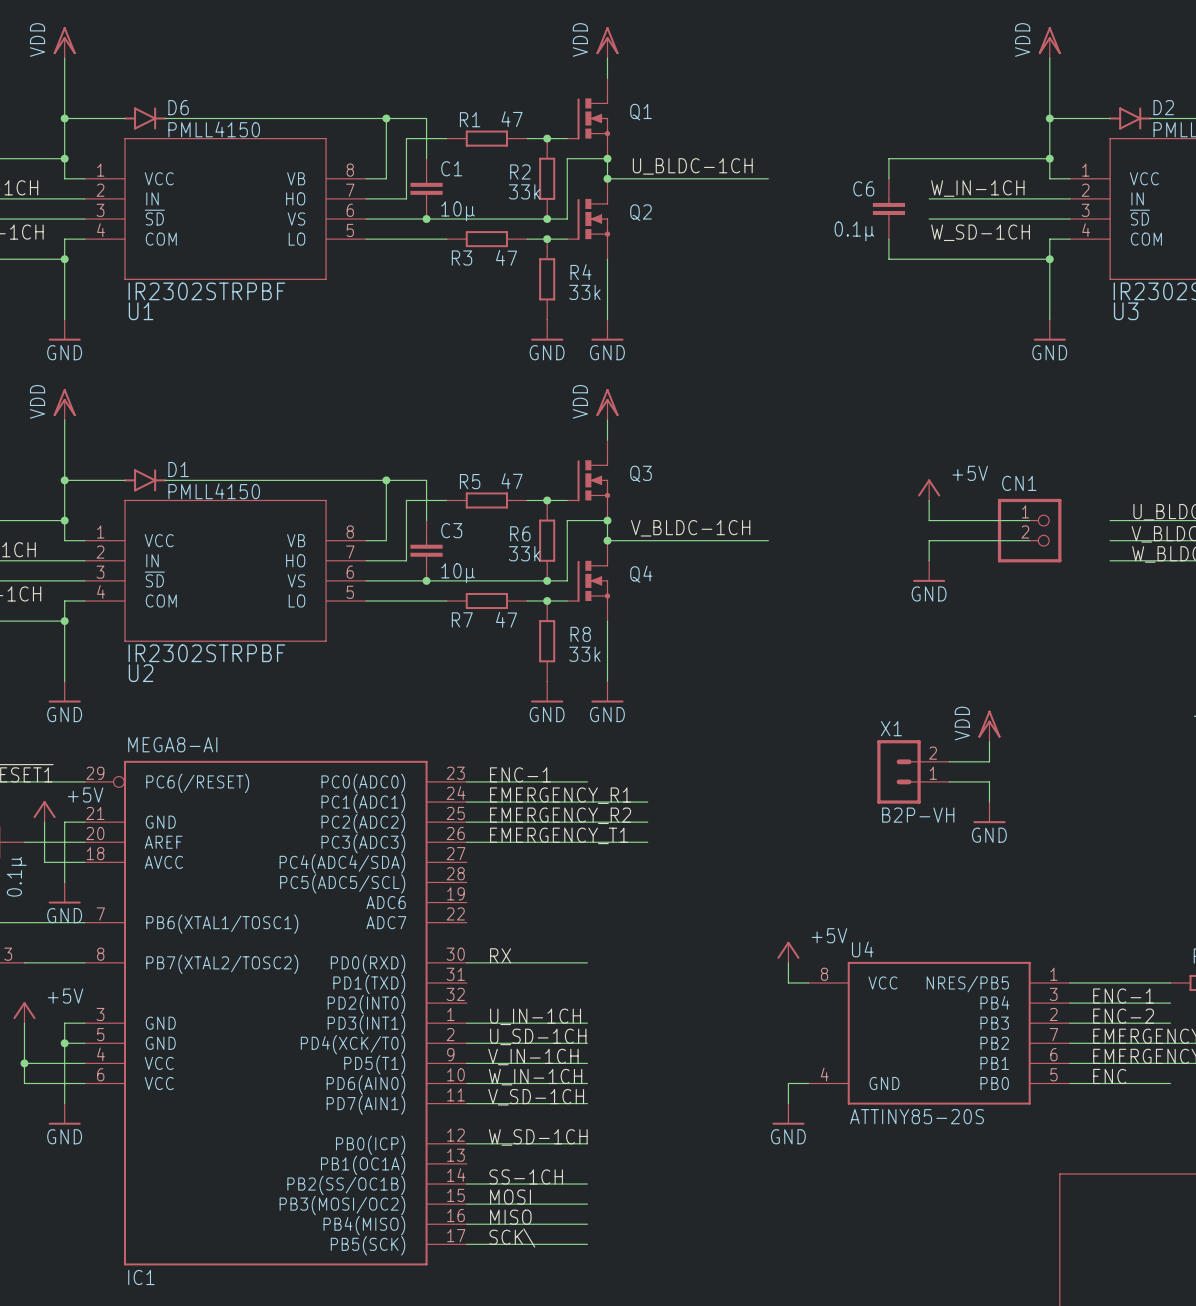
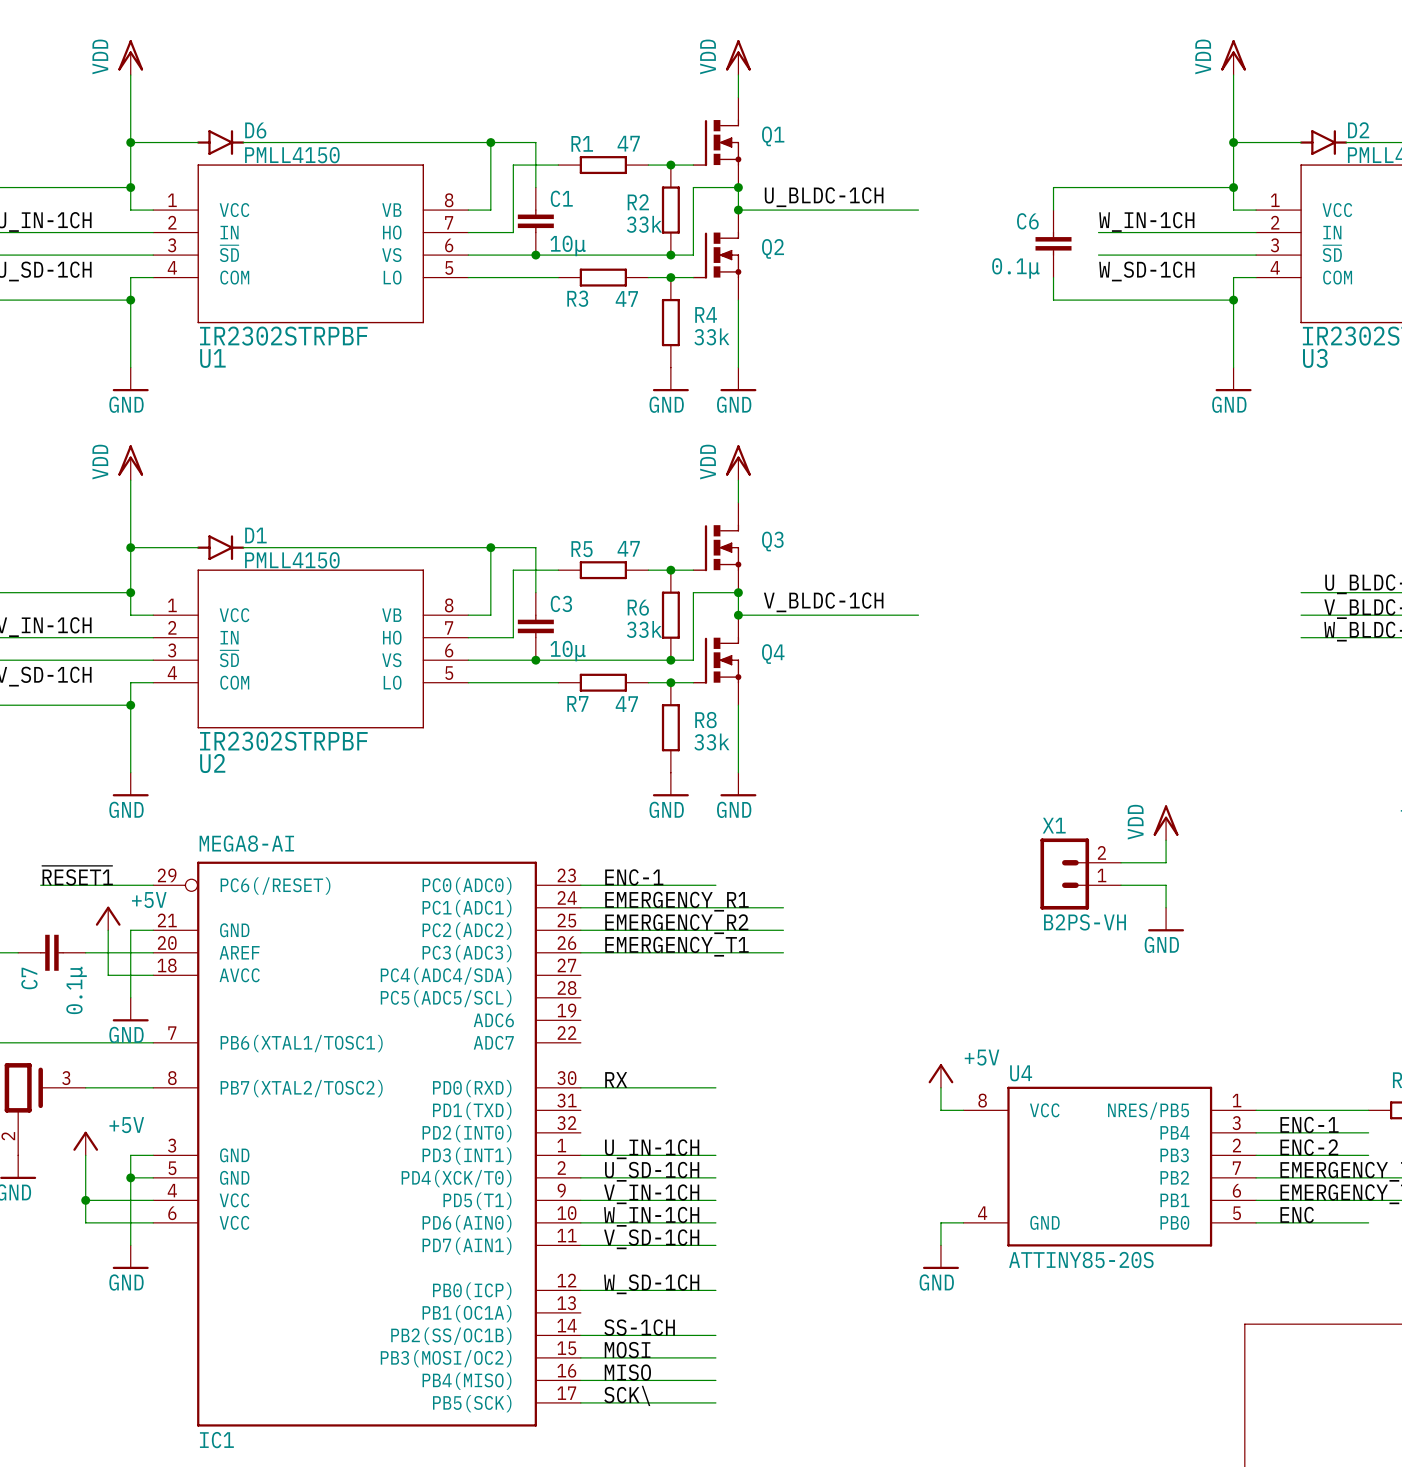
power symbol: +5V (929, 489) -> none
wire: (929, 500) (929, 520) (1029, 520) -> none
CN1: (1029, 530) -> none
wire: (1029, 540) (929, 540) (929, 560) -> none
power symbol: GND (929, 571) -> none
X1 value: B2P-VH (918, 815) -> B2PS-VH (1085, 922)

